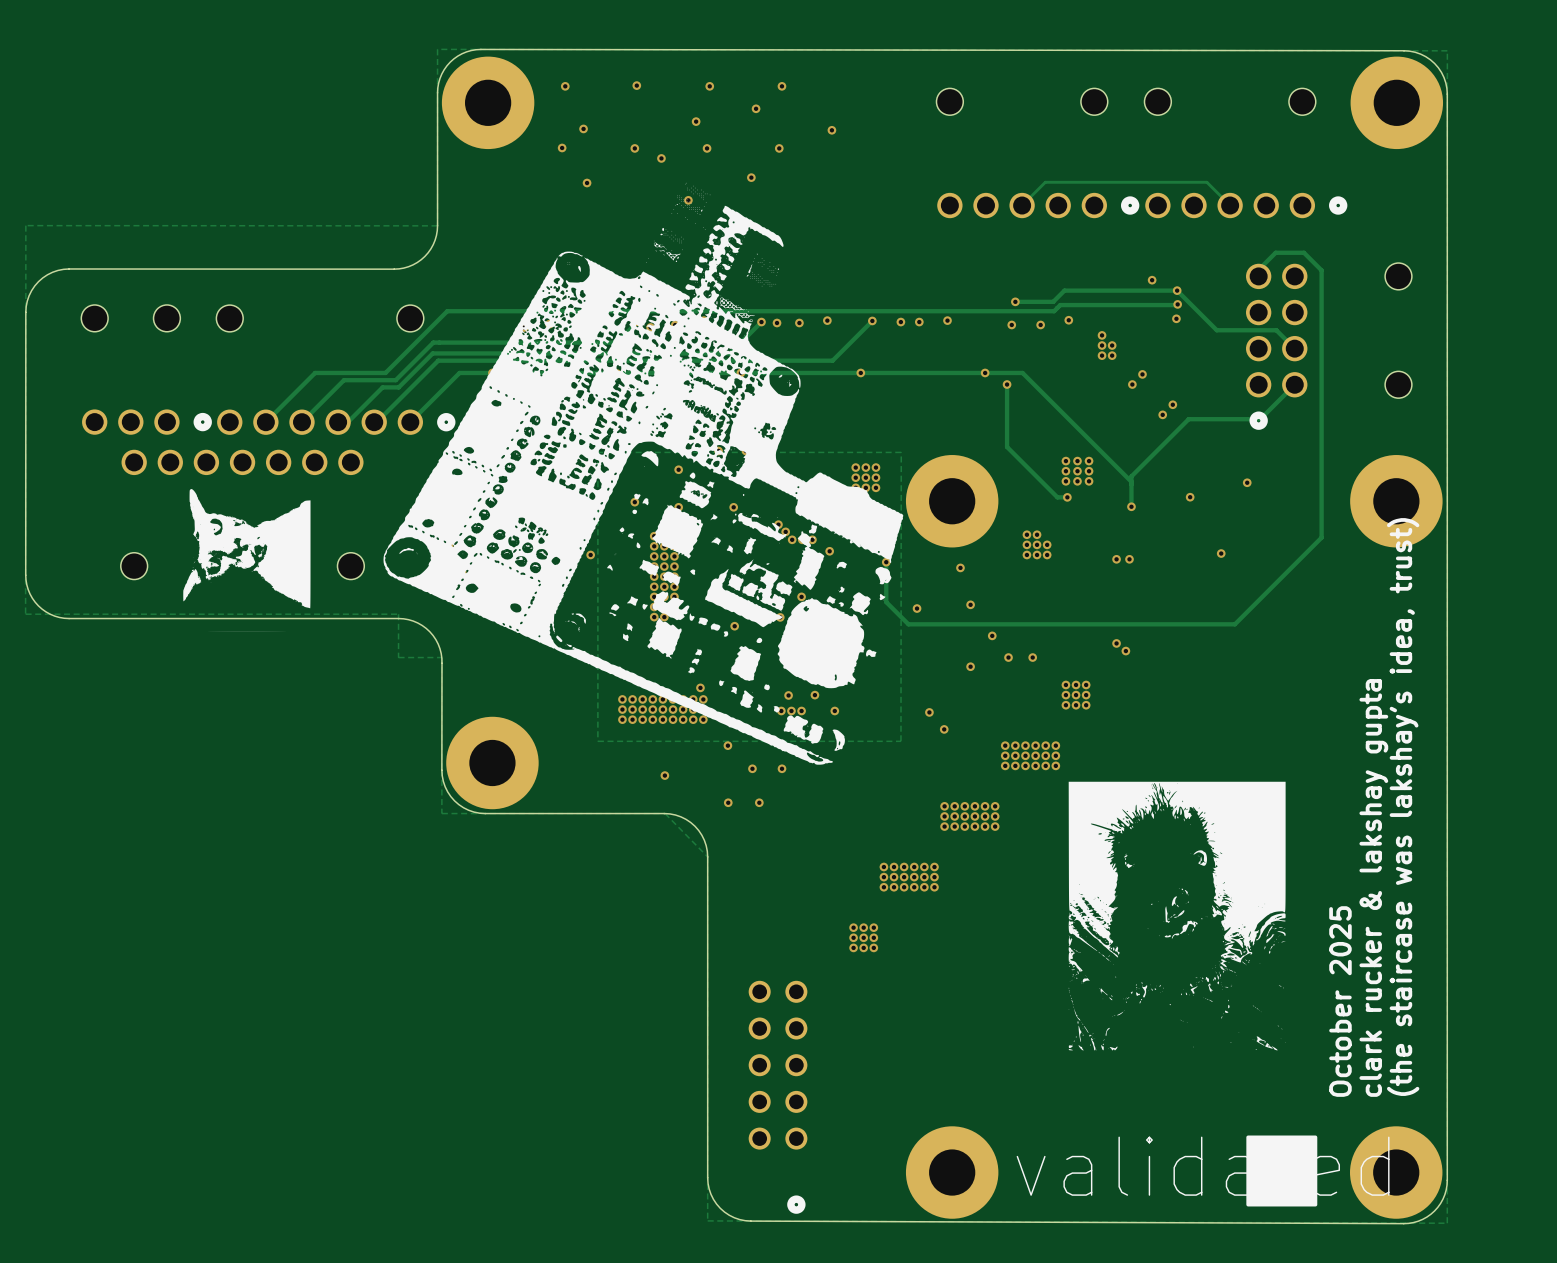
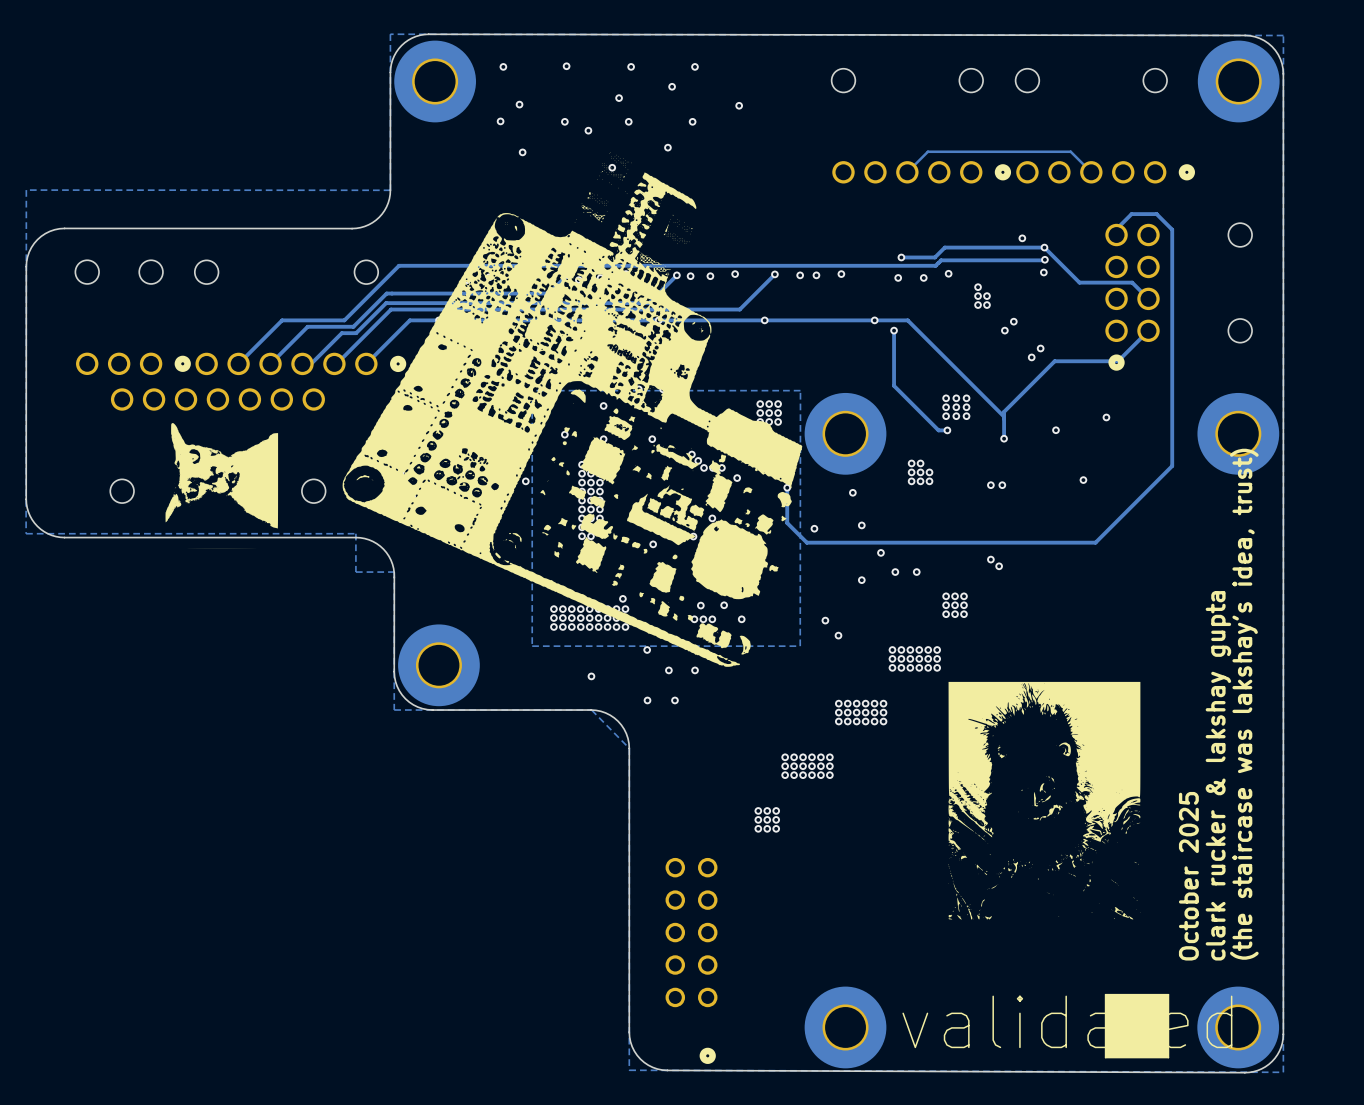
line: none -> (1168, 994) (1105, 994) (1105, 1057) (1168, 1057) (1168, 994)

